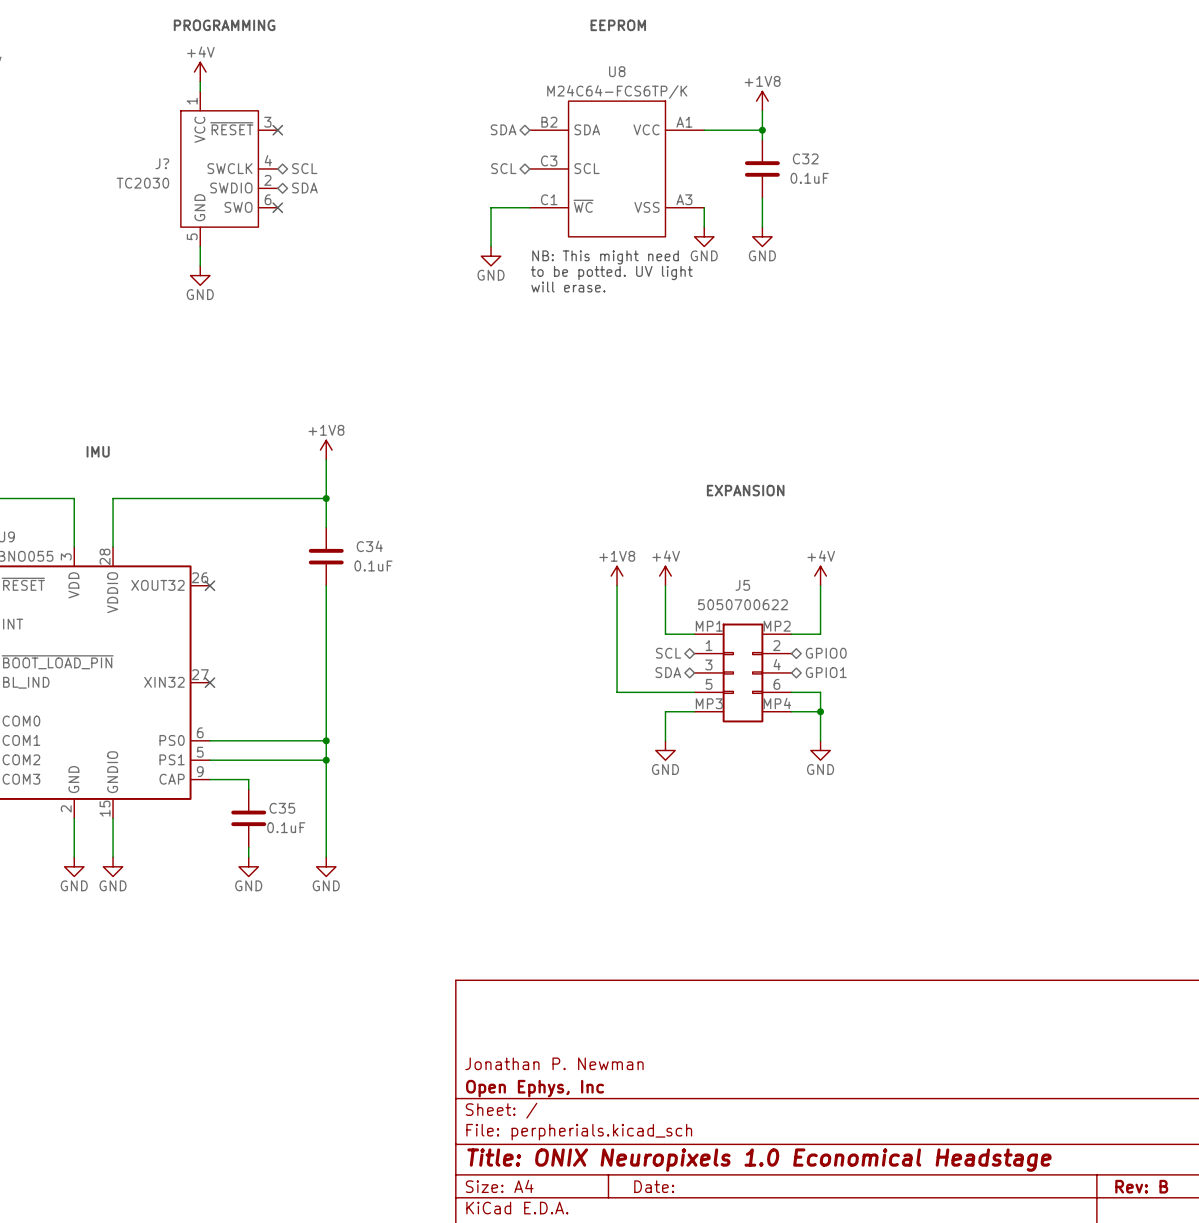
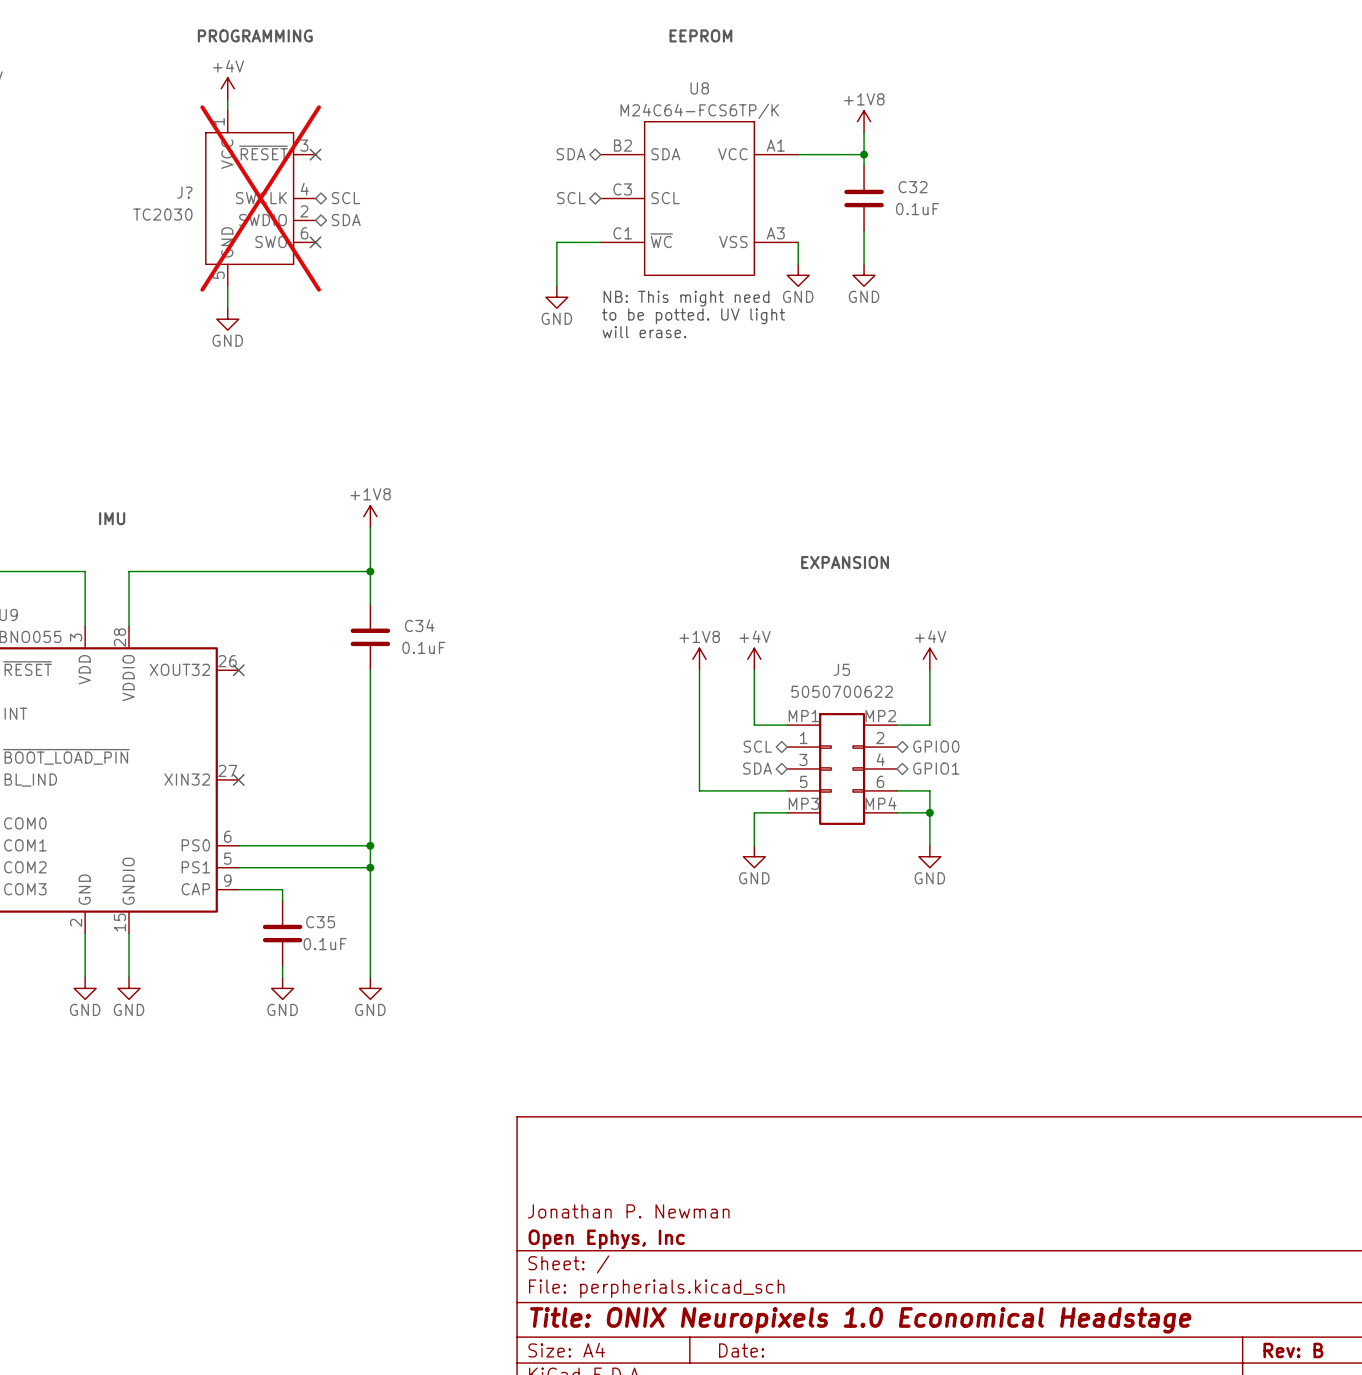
J? do-not-place cross: none -> (260, 198)

